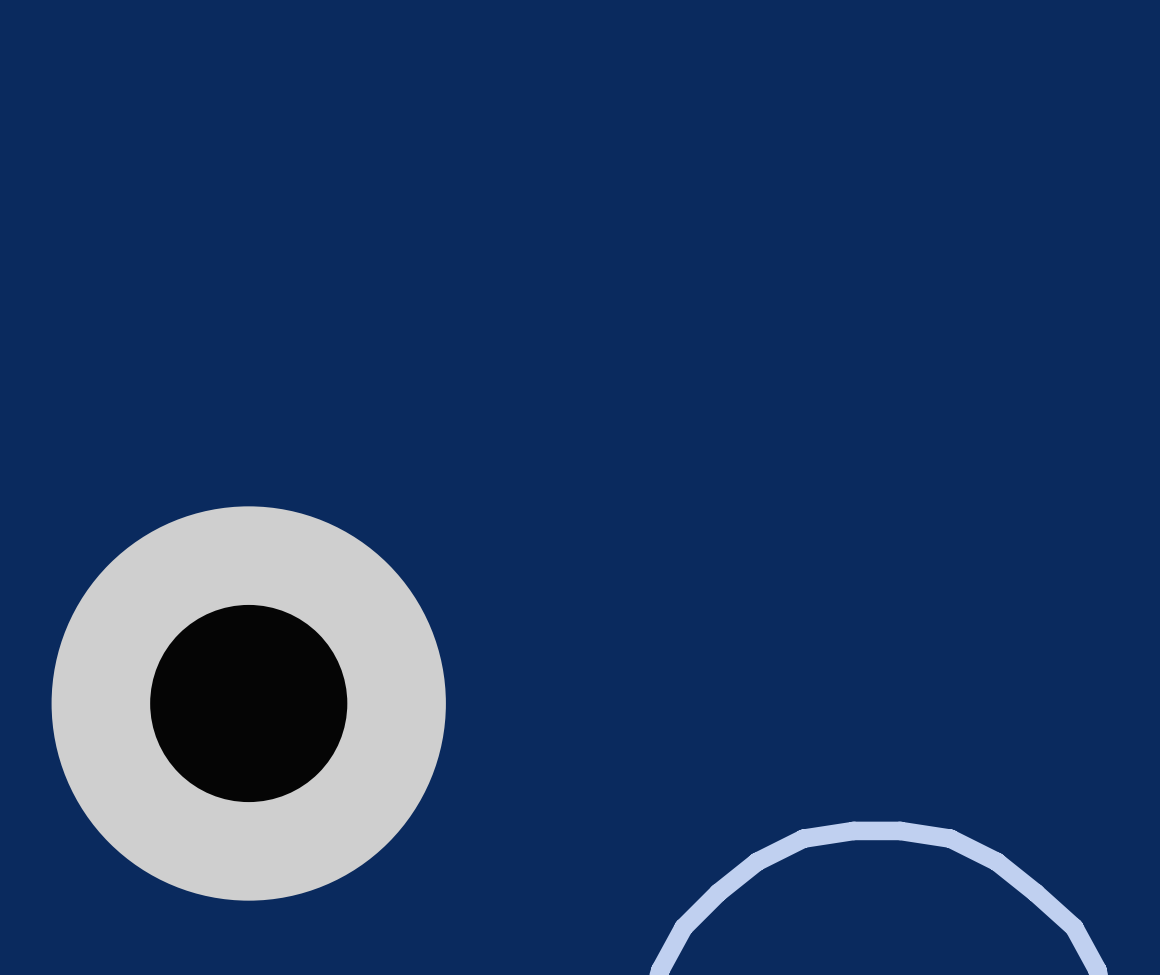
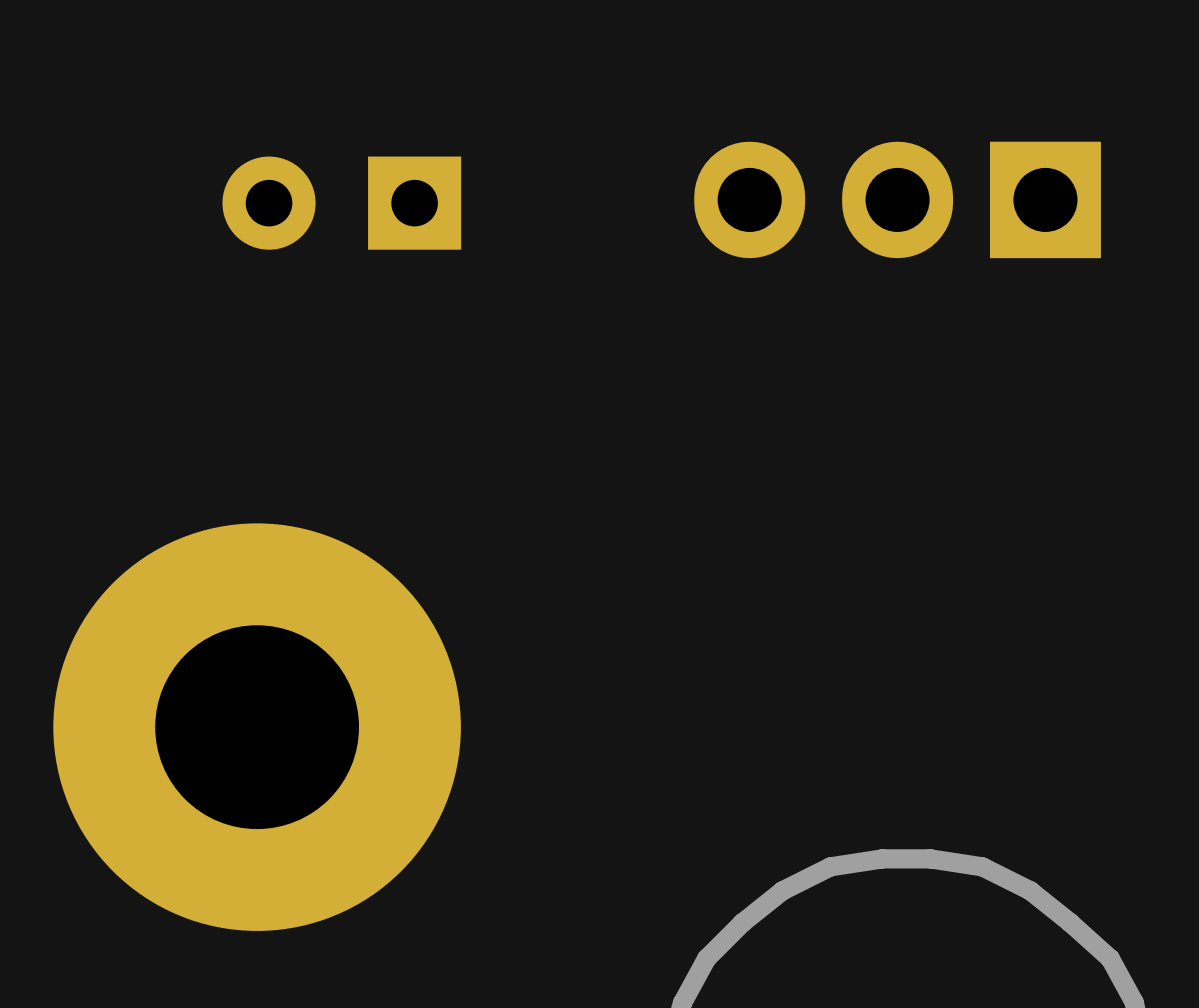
part: none -> (897, 199)
part: none -> (341, 203)

